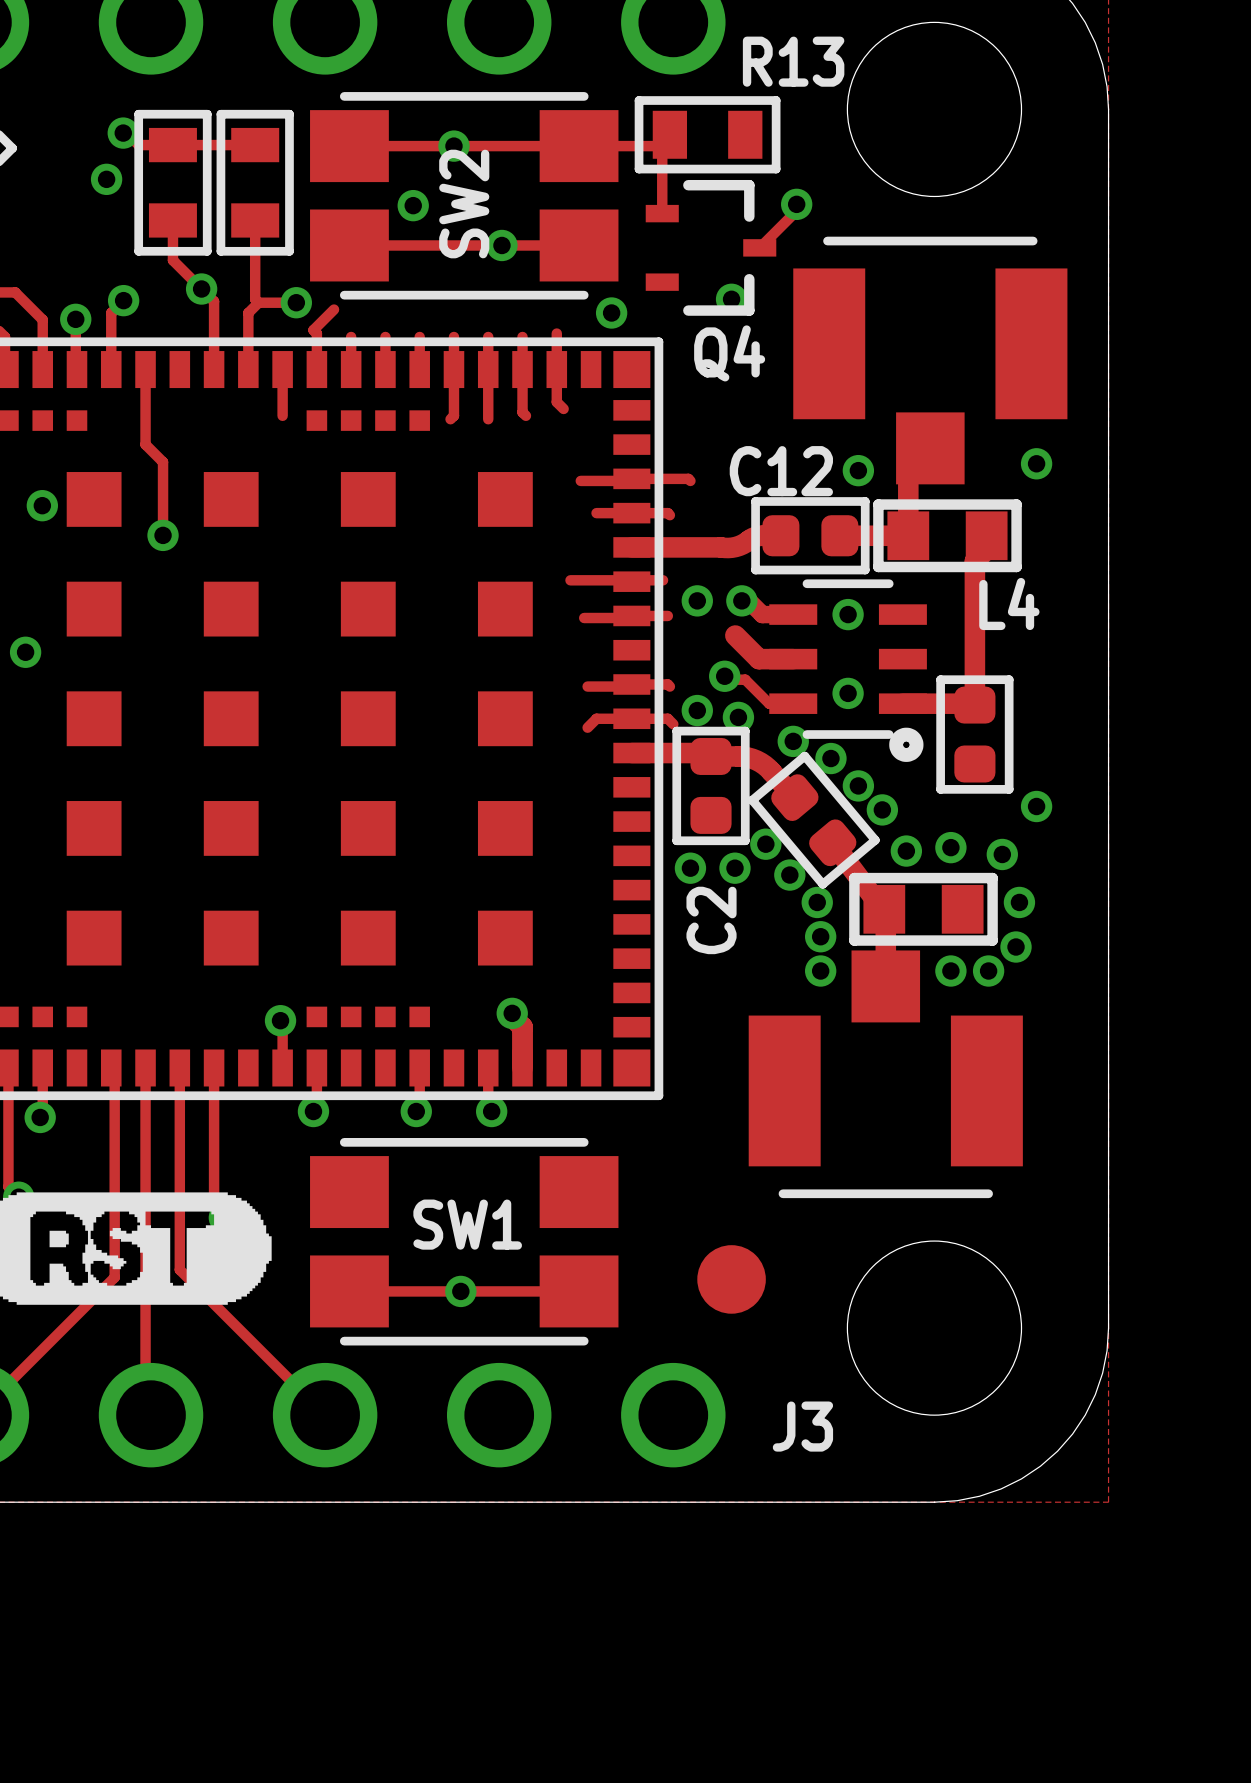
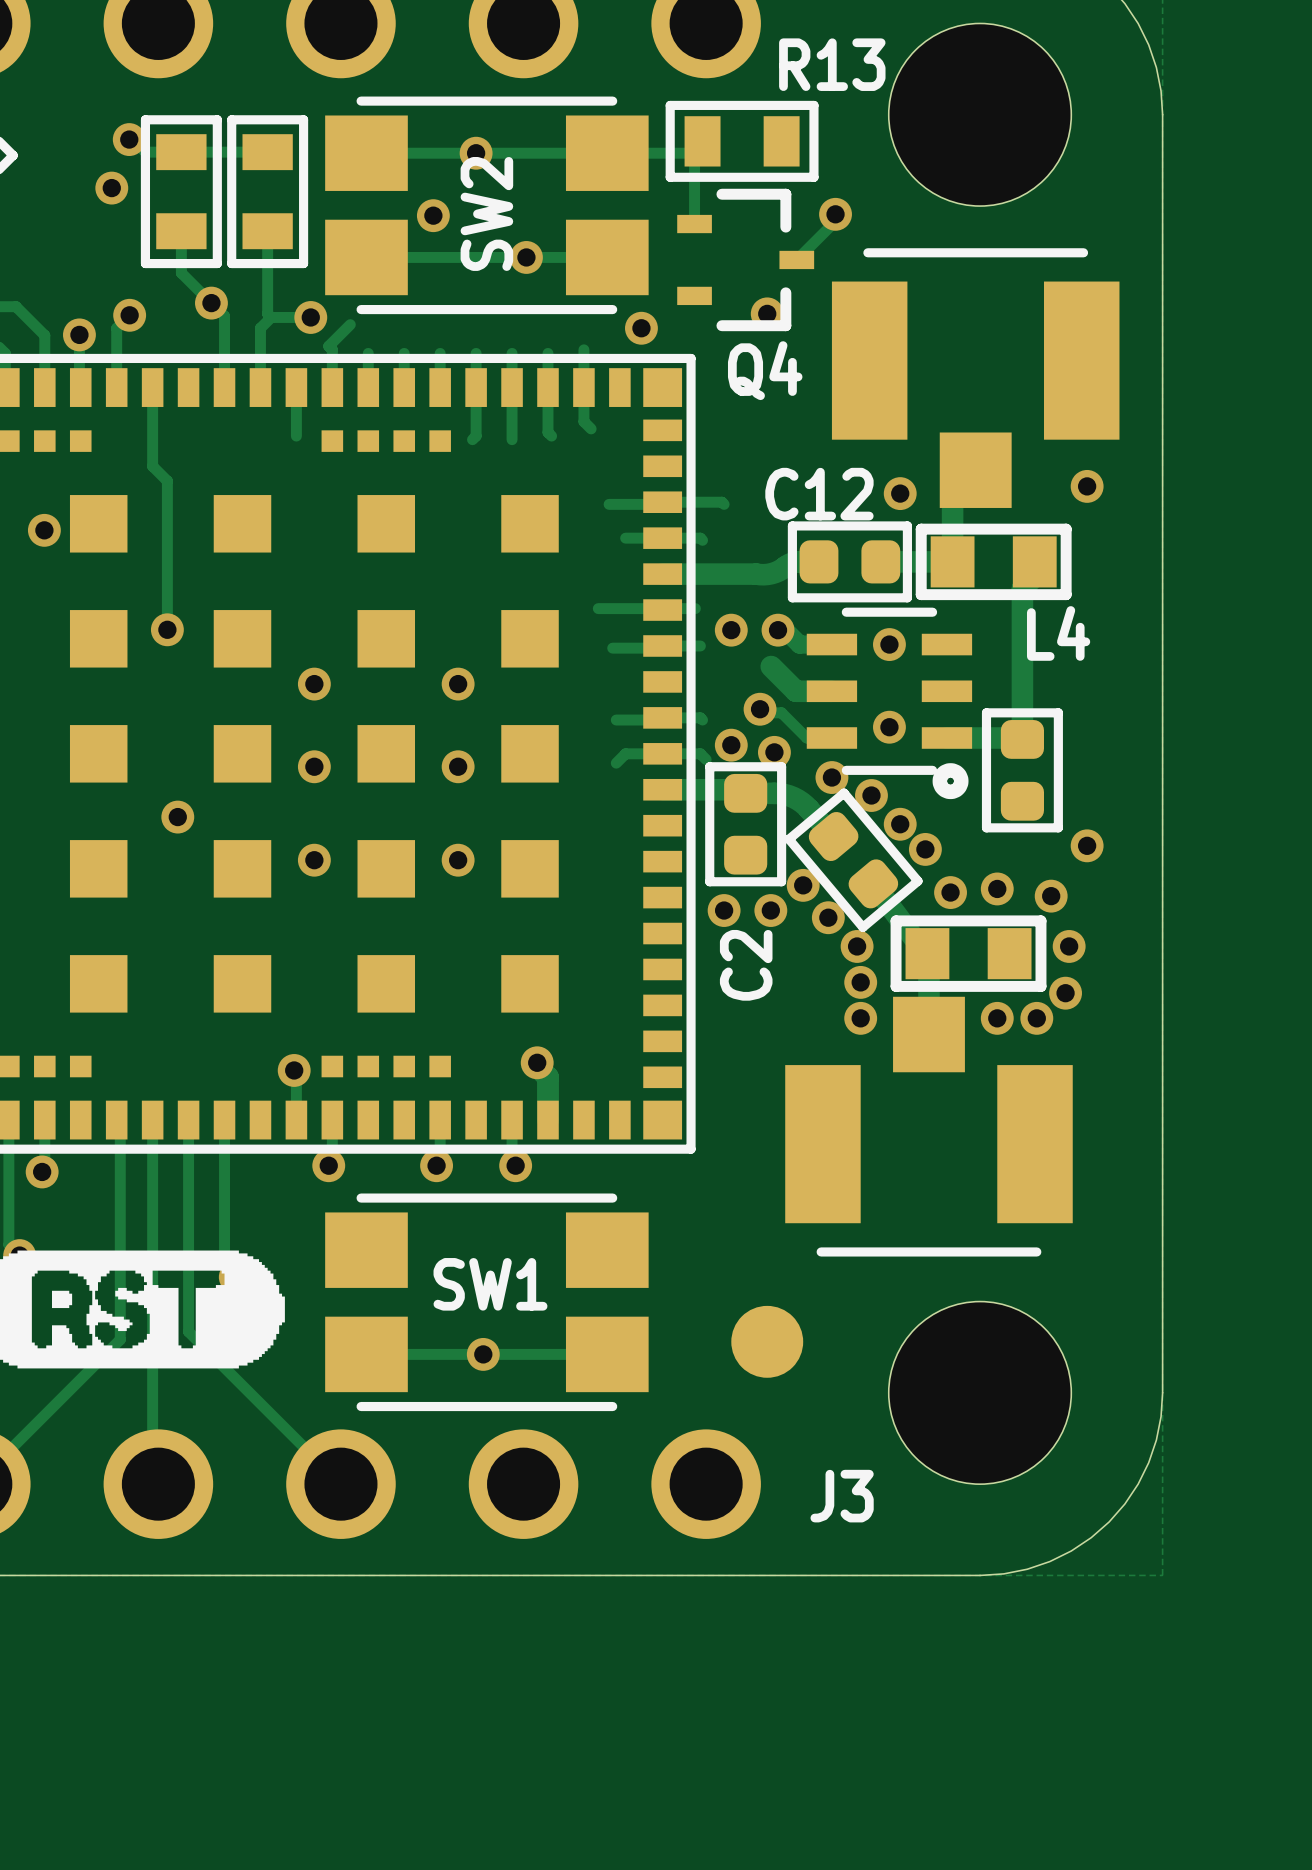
track: (159, 458) (163, 462) (163, 535) -> (167, 481) (167, 629)
via position: (163, 535) -> (167, 629)
via: (25, 652) -> none
via: none -> (314, 684)
via: none -> (458, 684)
via: none -> (314, 766)
via: none -> (458, 766)
via: none -> (177, 817)
via: none -> (314, 860)
via: none -> (458, 860)

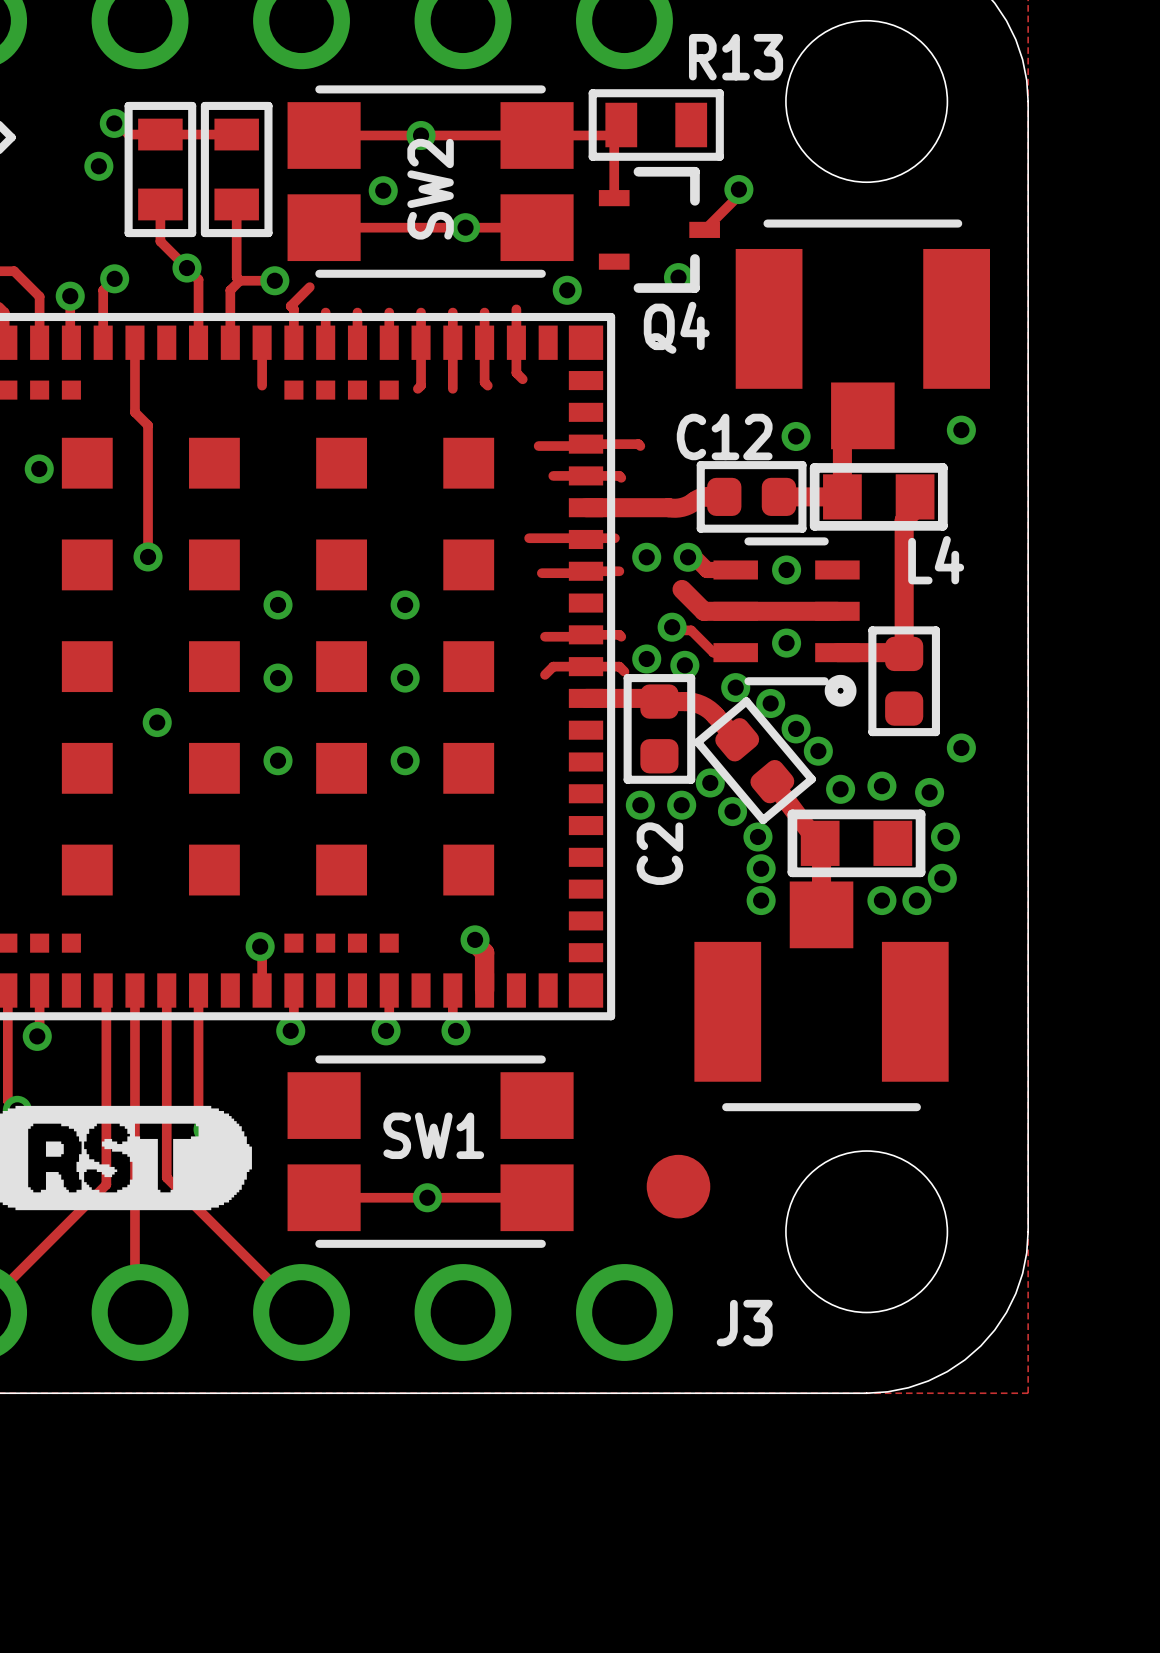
track: none -> (735, 611) (837, 611)

